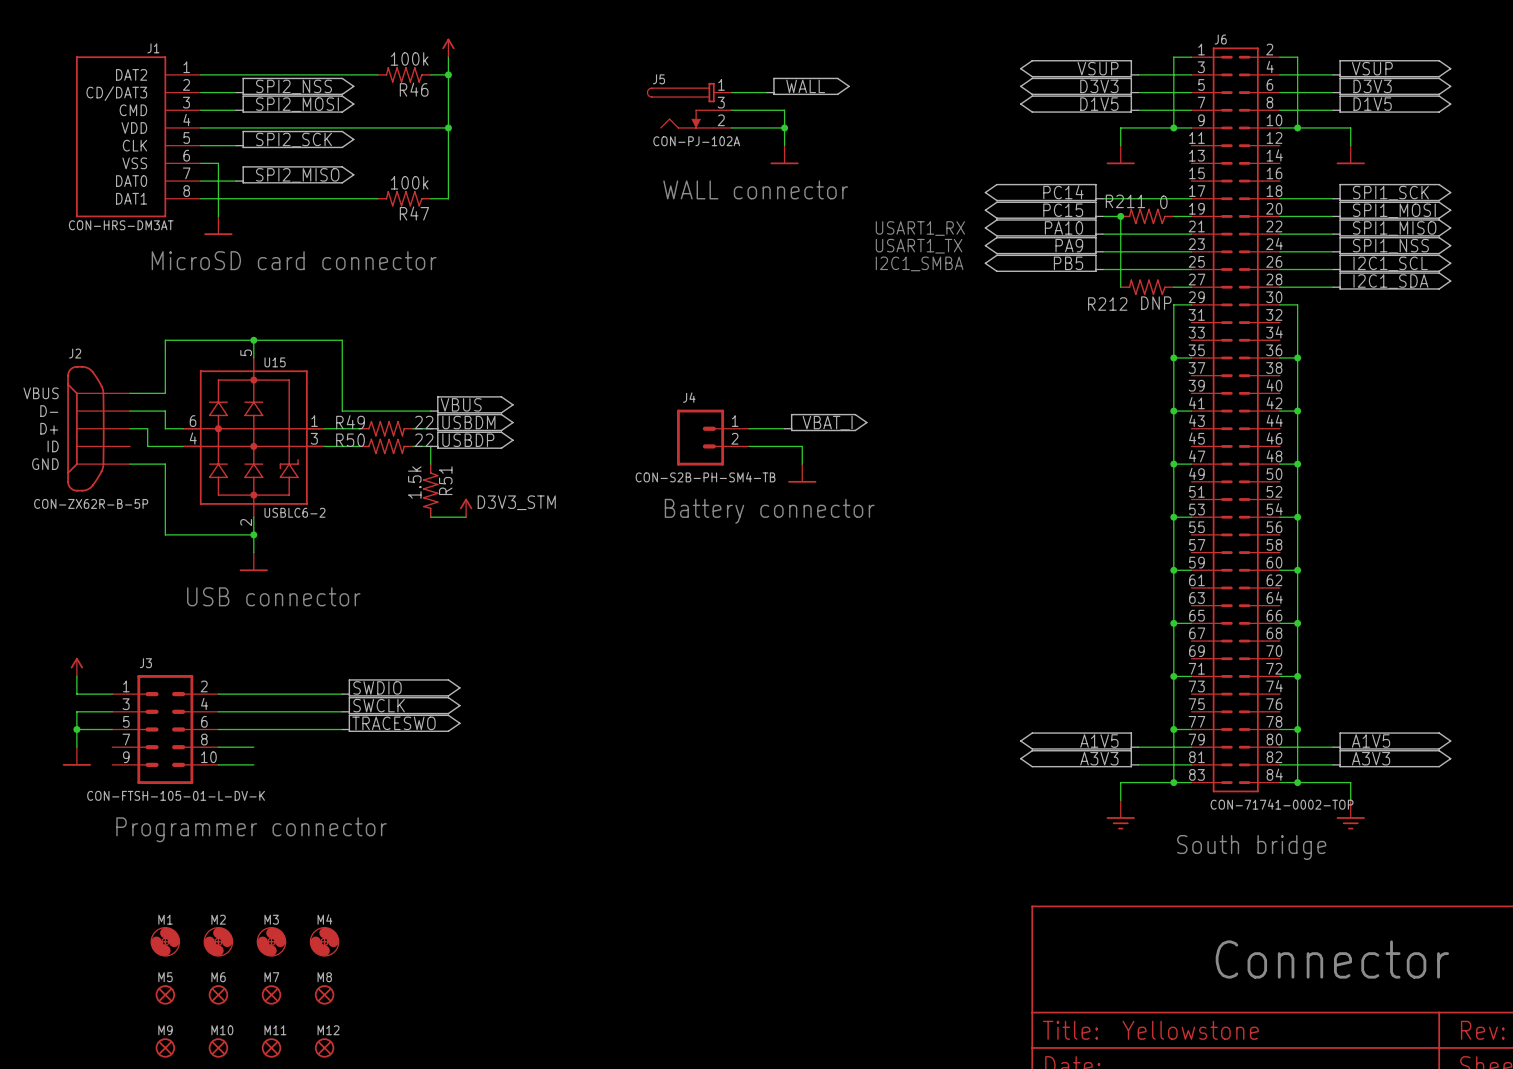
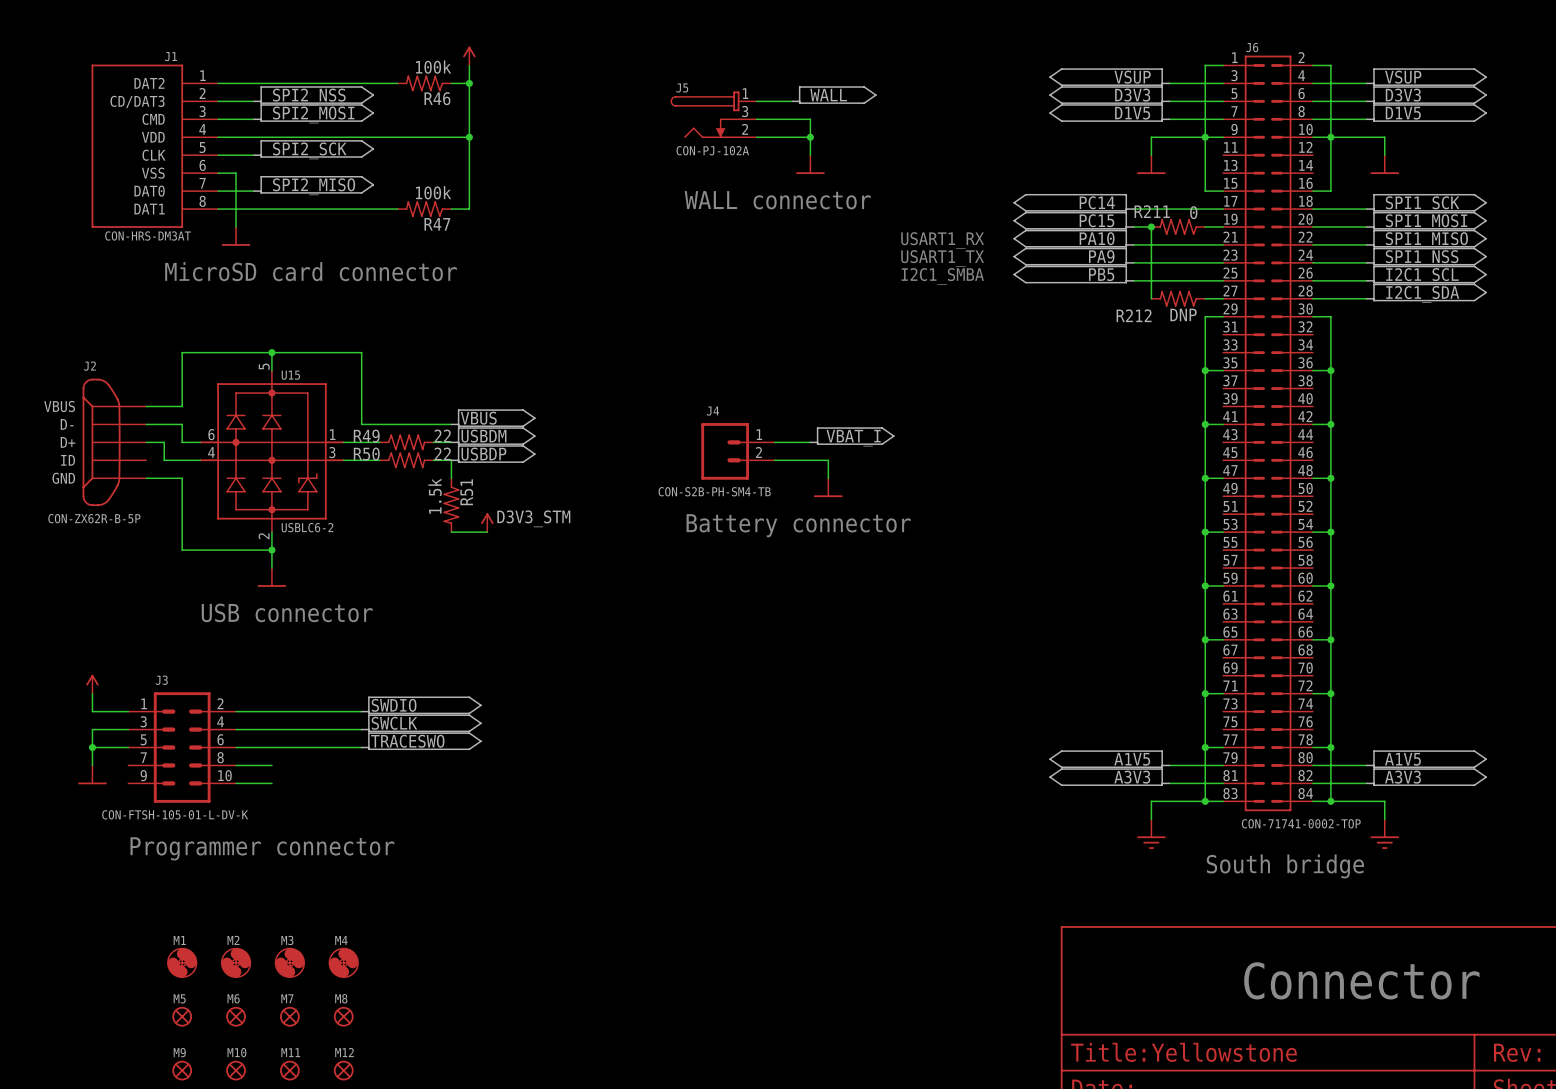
wire: none -> (1205, 137) (1205, 191) (1223, 191)
wire: none -> (1330, 137) (1330, 191) (1312, 191)

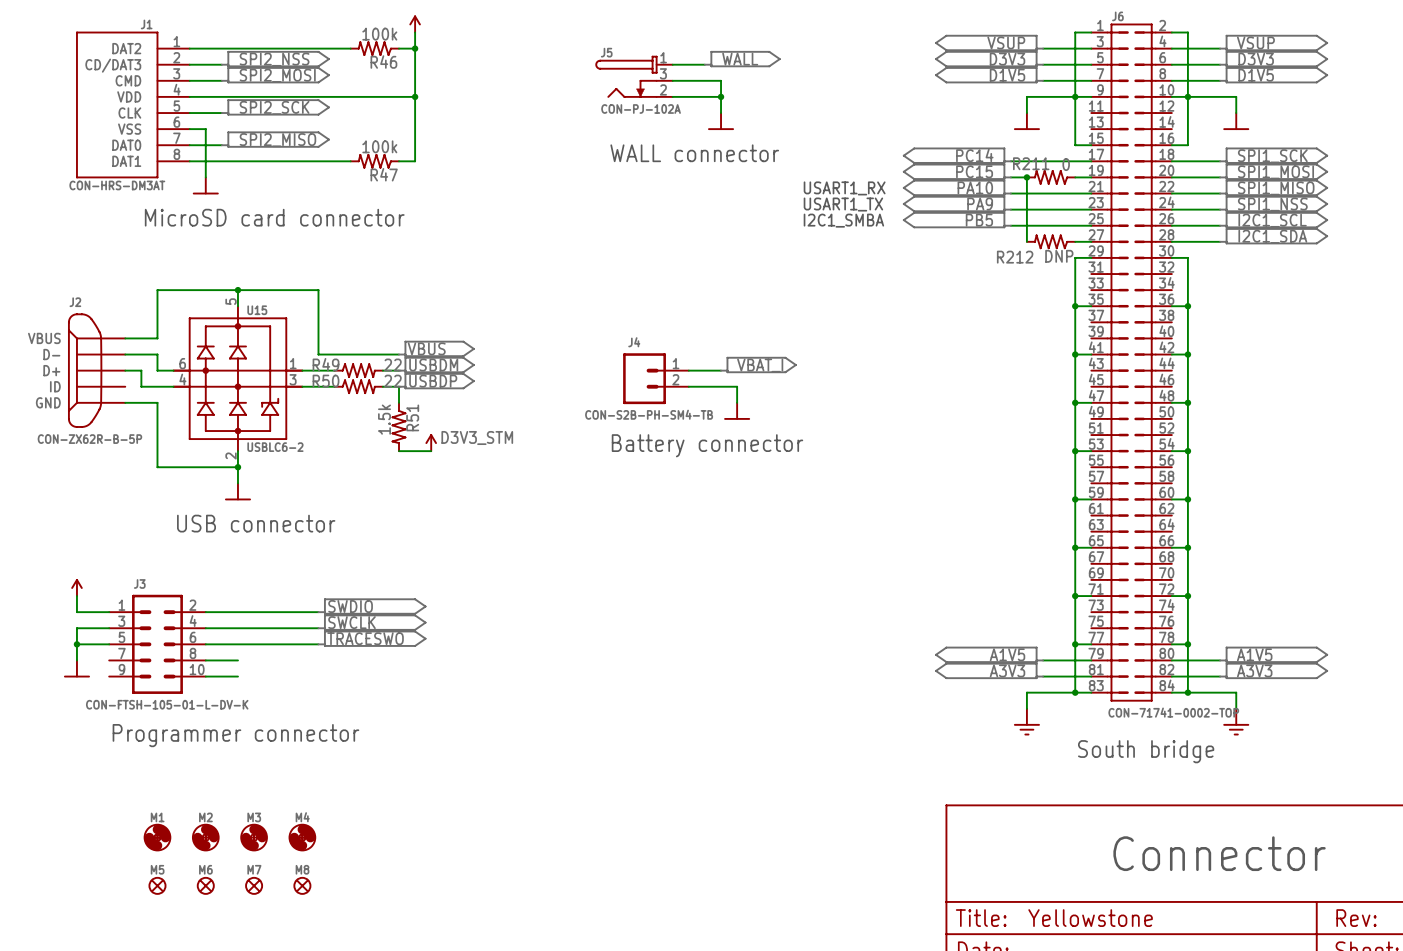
M9: (182, 1070) -> none
M10: (236, 1070) -> none
M11: (289, 1070) -> none
M12: (343, 1070) -> none

